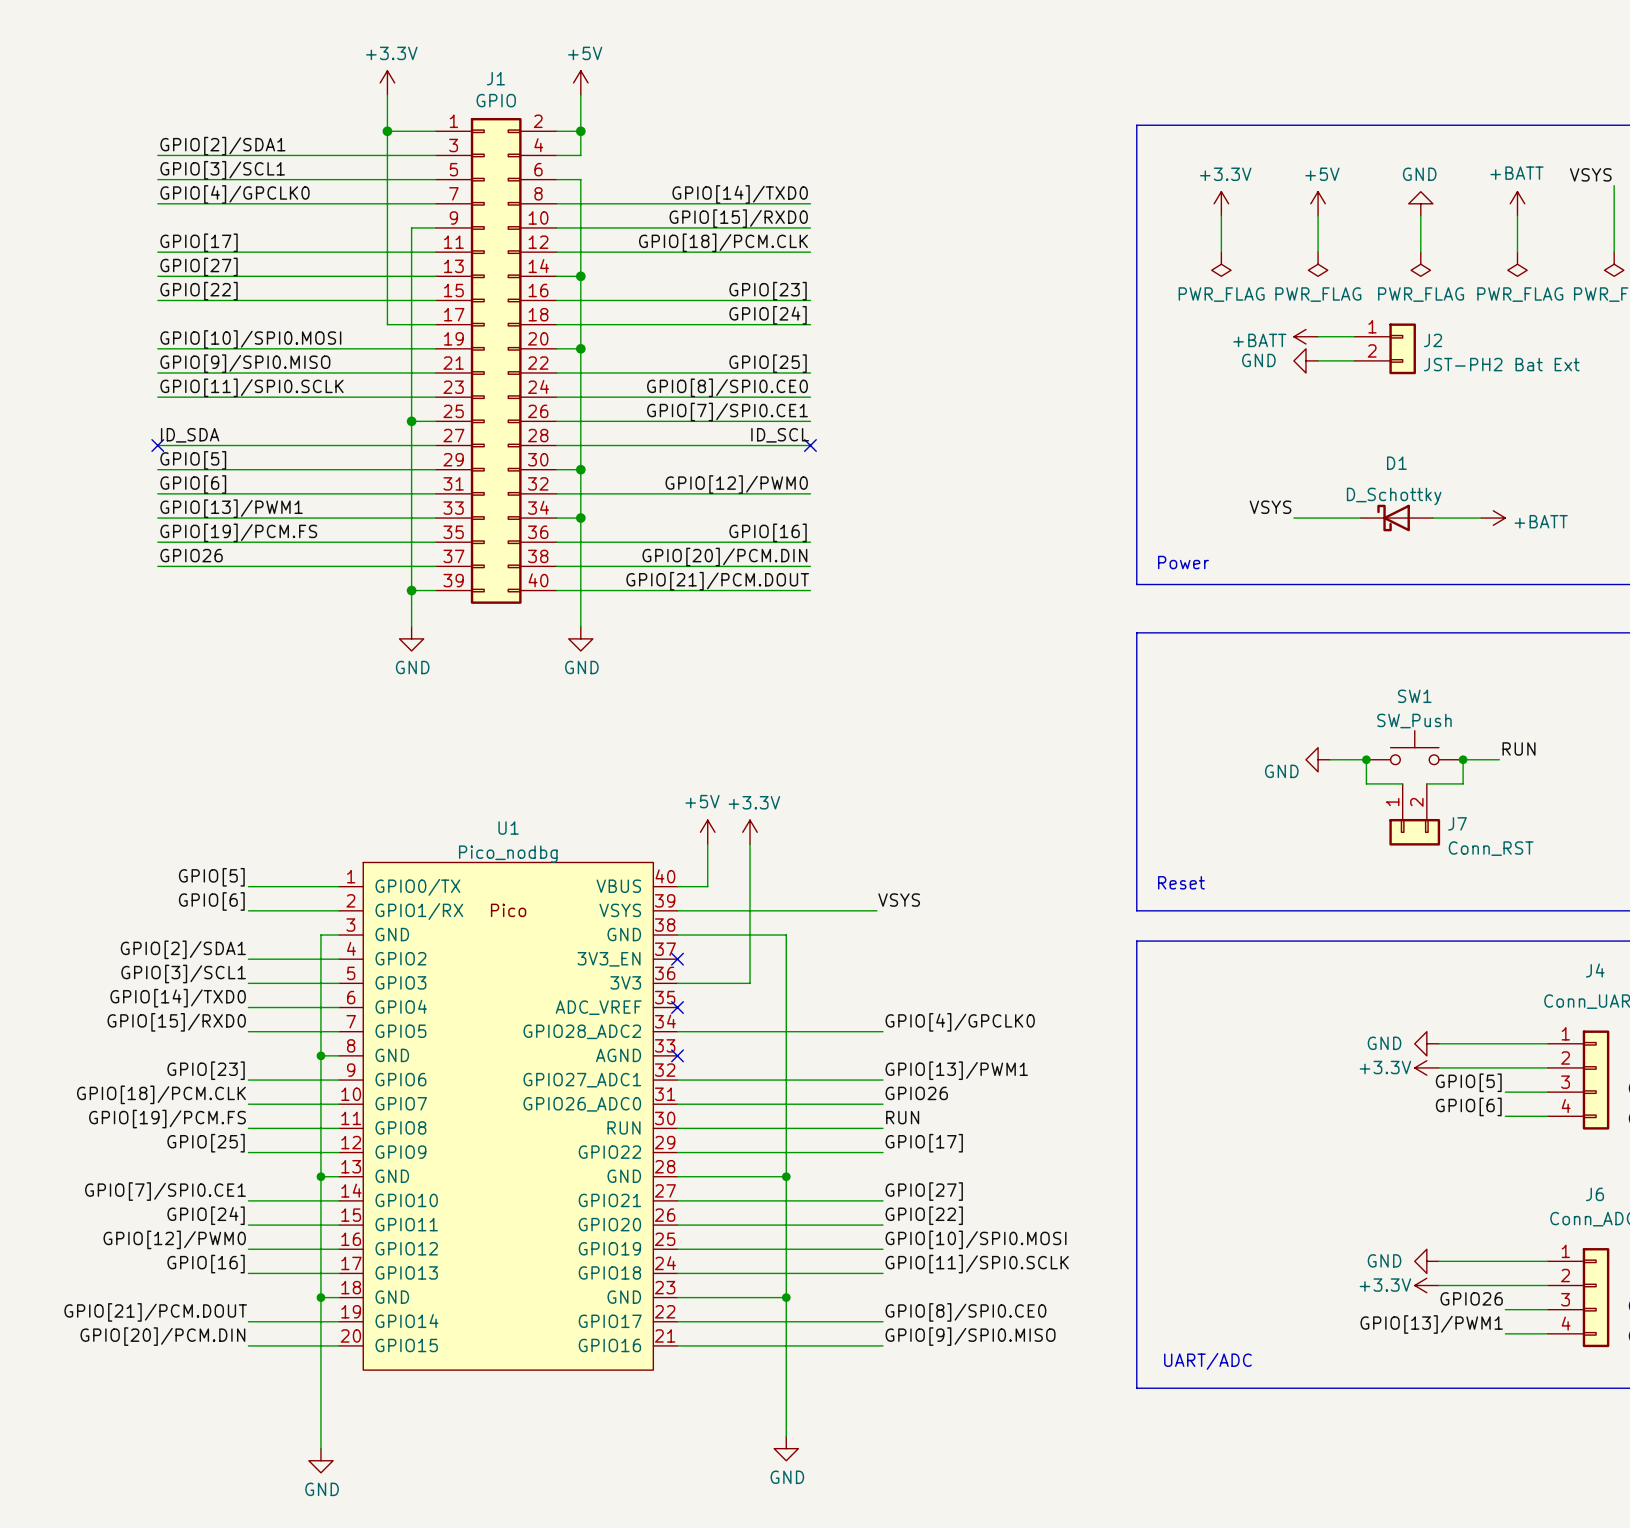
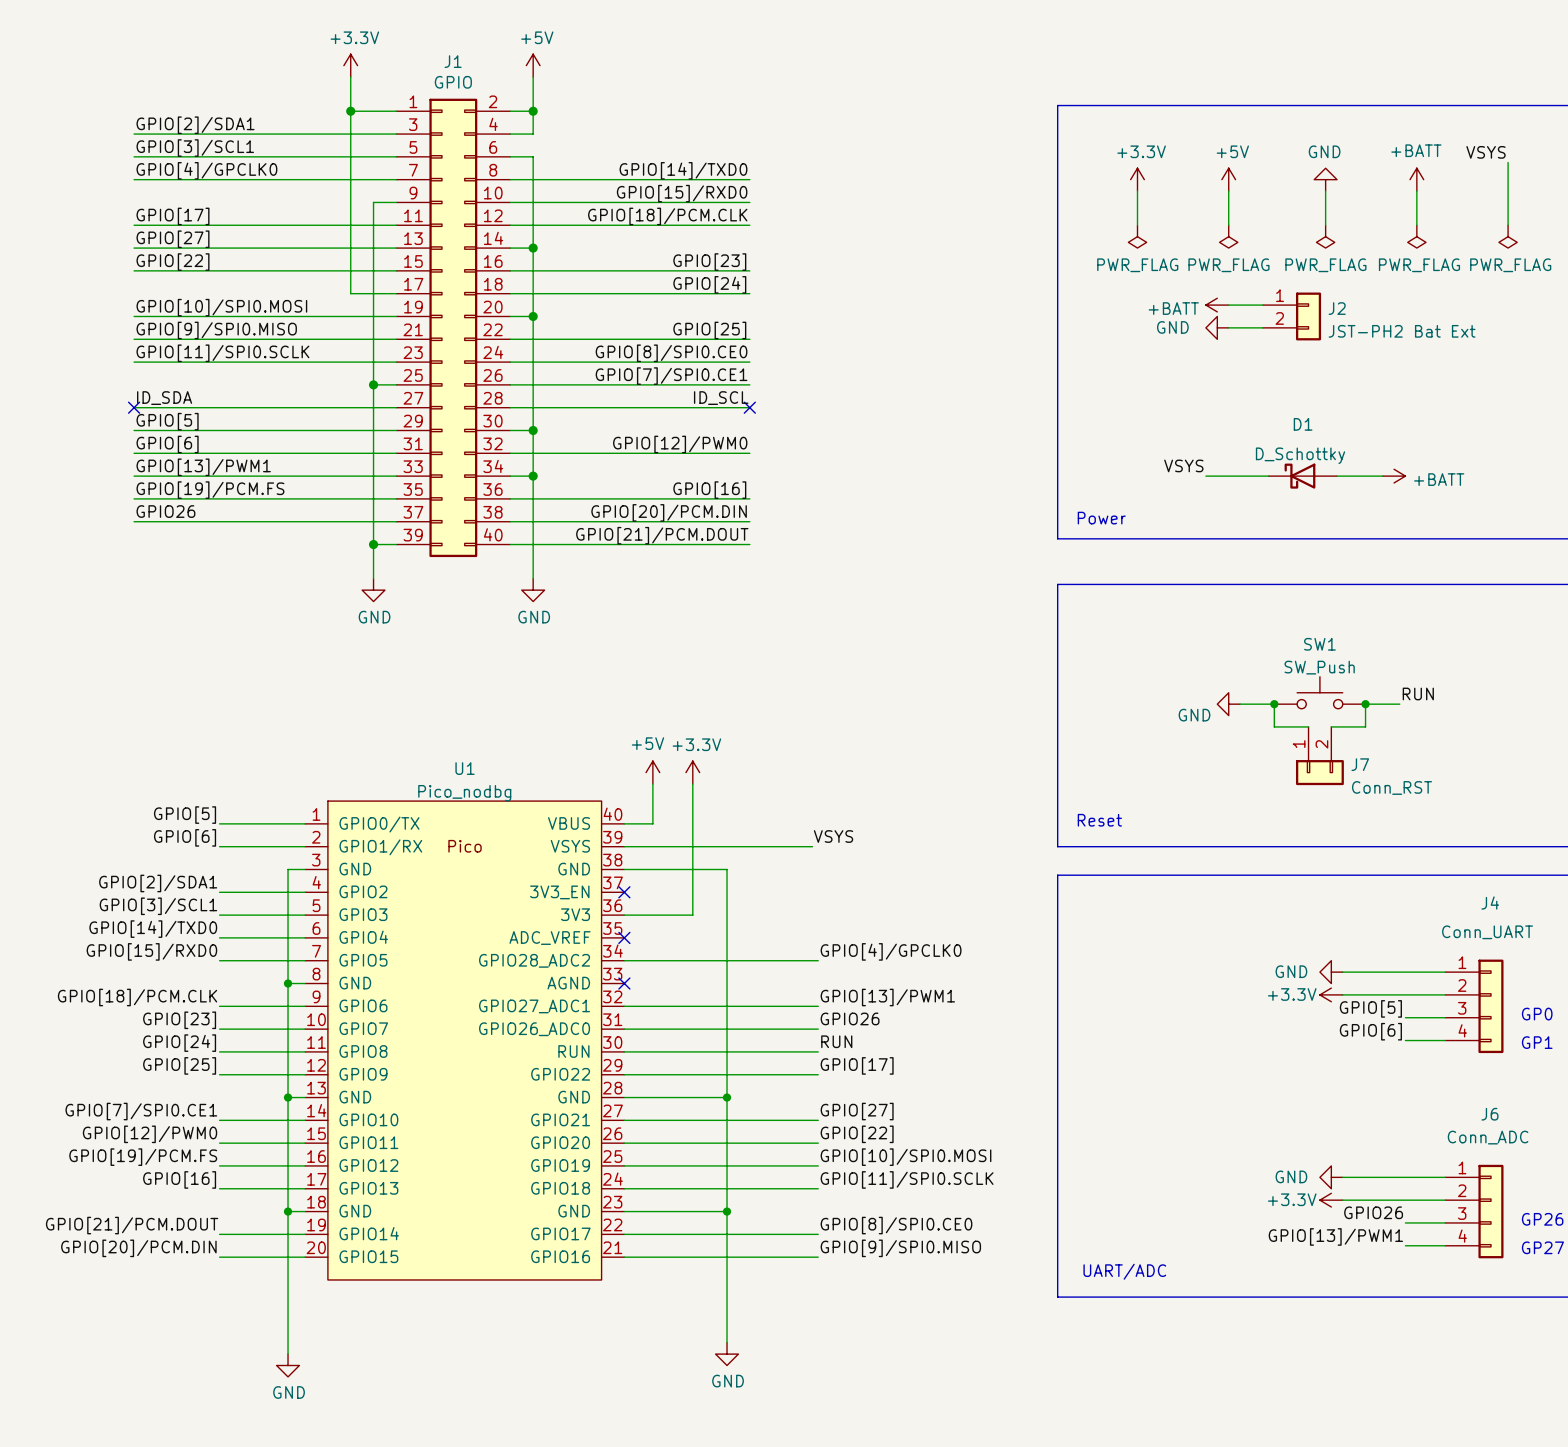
label: GPIO[23] (206, 1070) -> GPIO[18]/PCM.CLK (137, 997)
label: GPIO[18]/PCM.CLK (161, 1094) -> GPIO[23] (179, 1020)
label: GPIO[19]/PCM.FS (167, 1119) -> GPIO[24] (179, 1043)
label: GPIO[24] (206, 1215) -> GPIO[12]/PWM0 (150, 1134)
label: GPIO[12]/PWM0 (174, 1239) -> GPIO[19]/PCM.FS (143, 1157)

